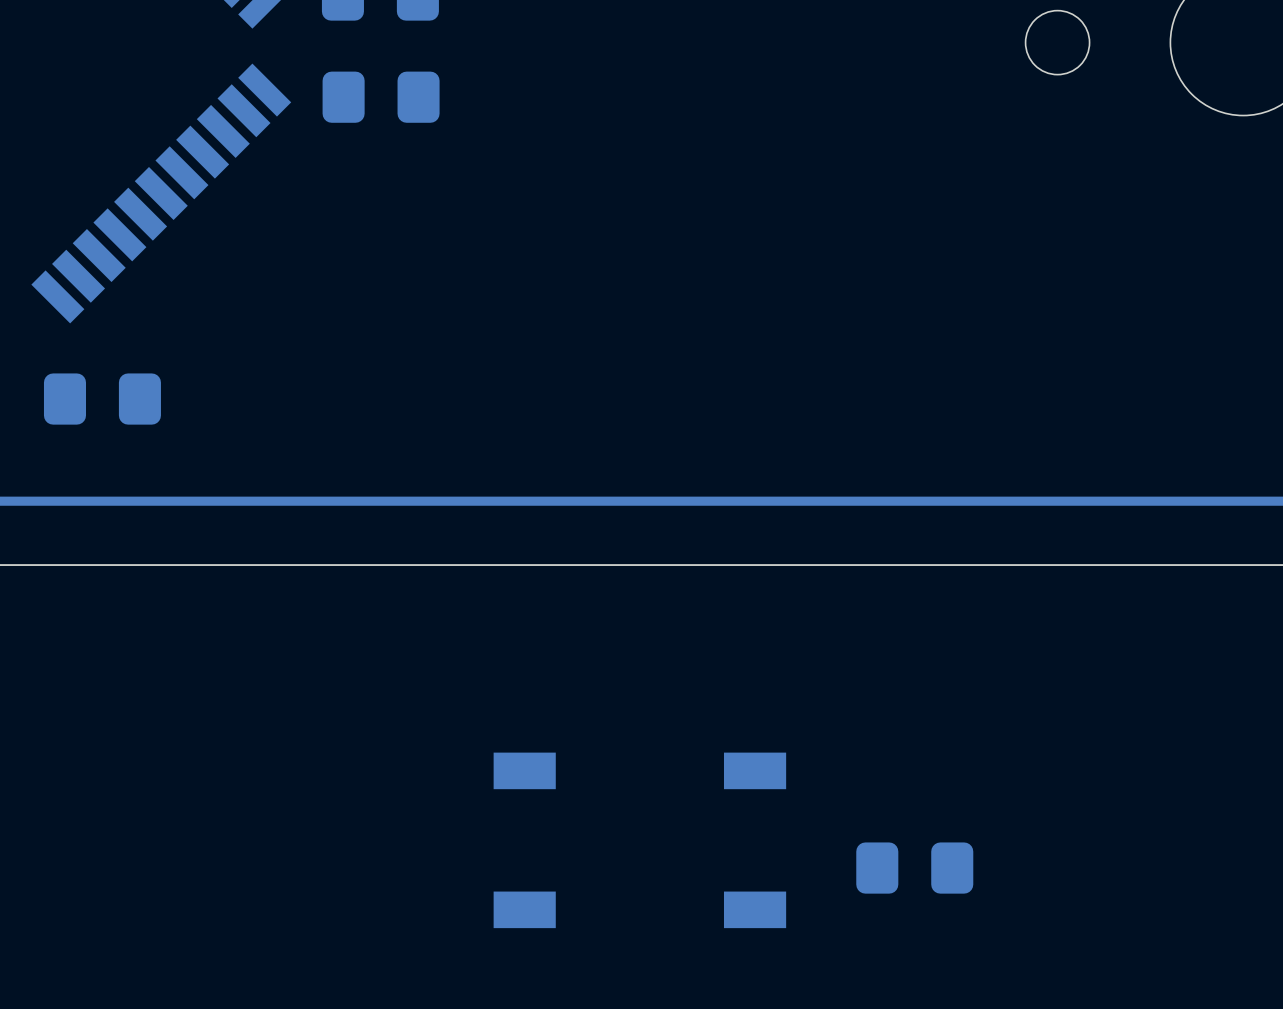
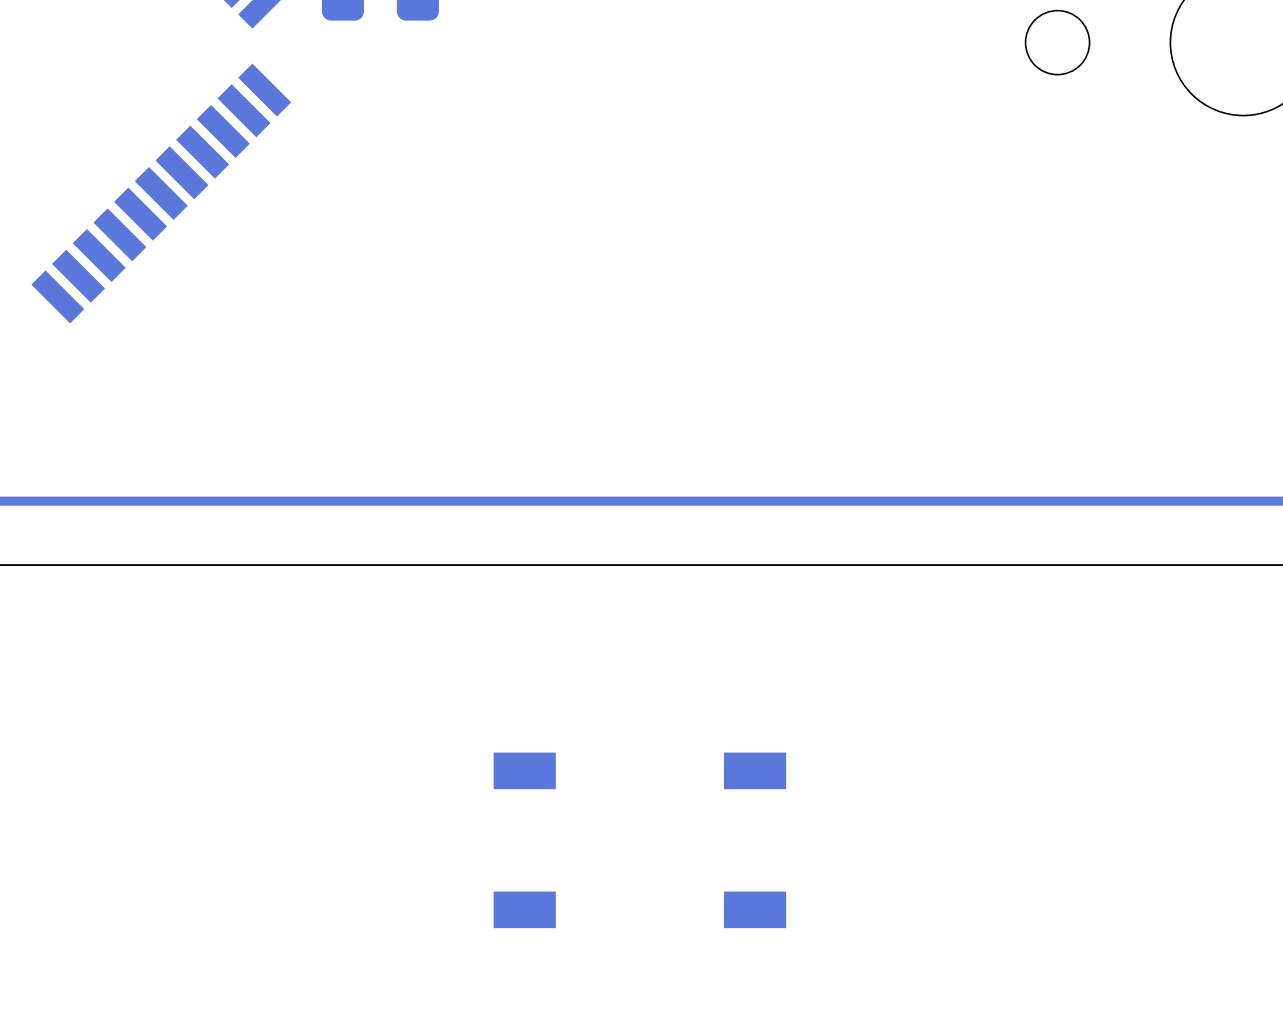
part: (381, 97) -> none
part: (102, 399) -> none
part: (914, 868) -> none

